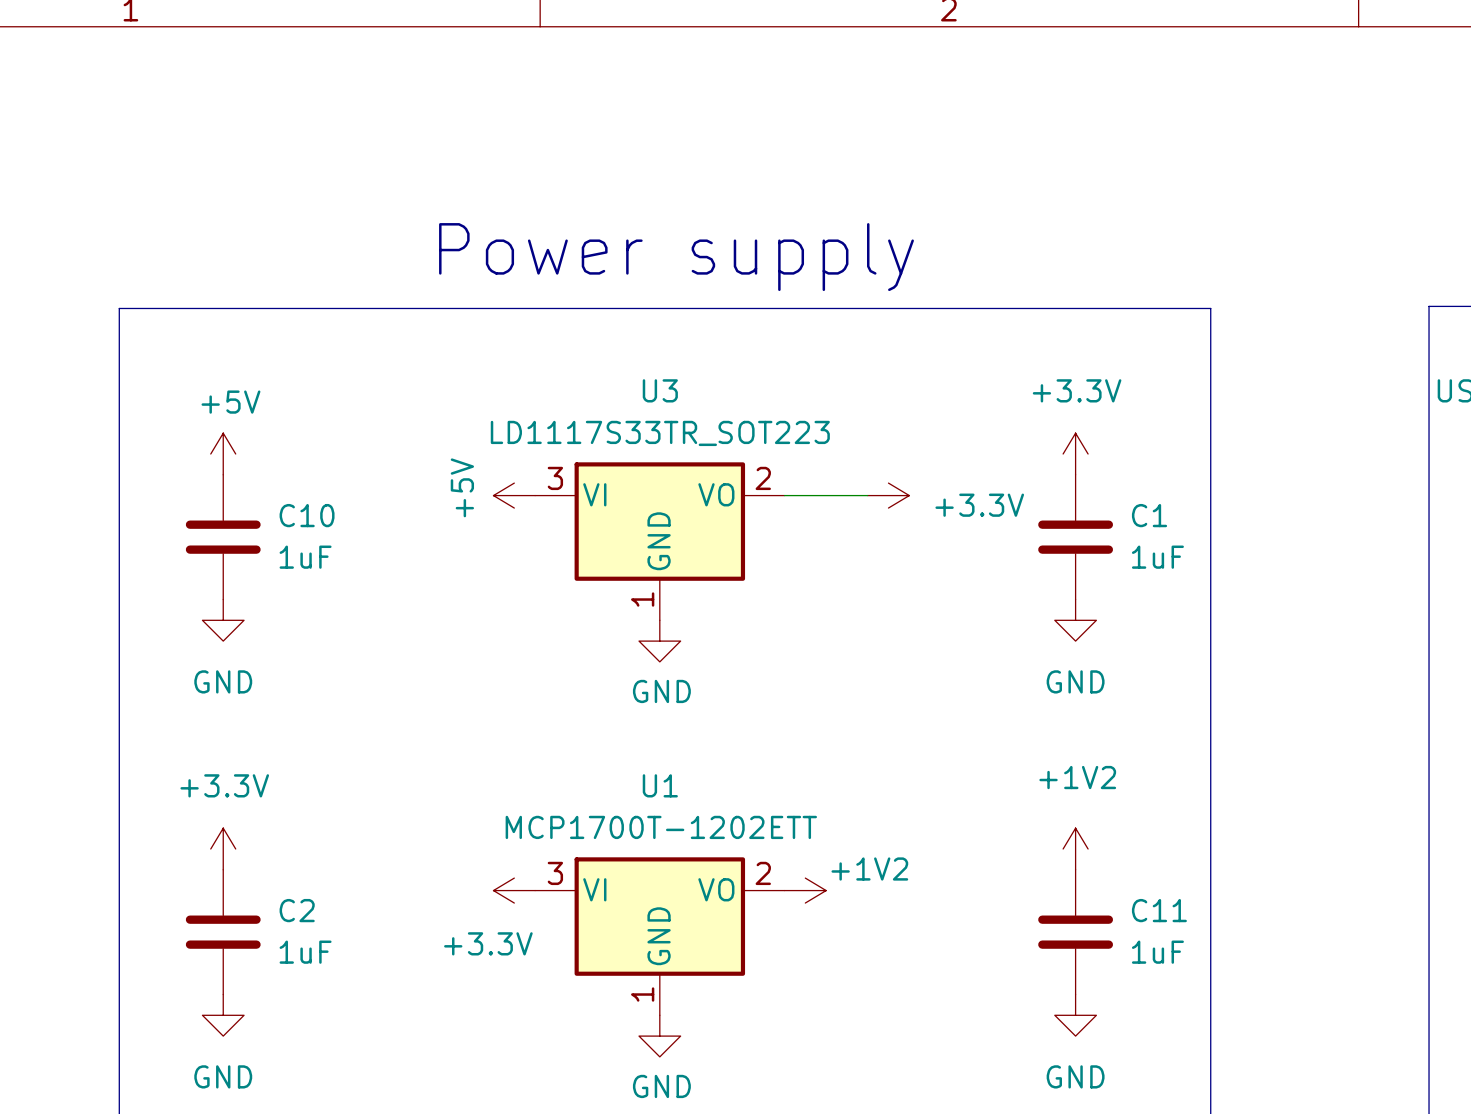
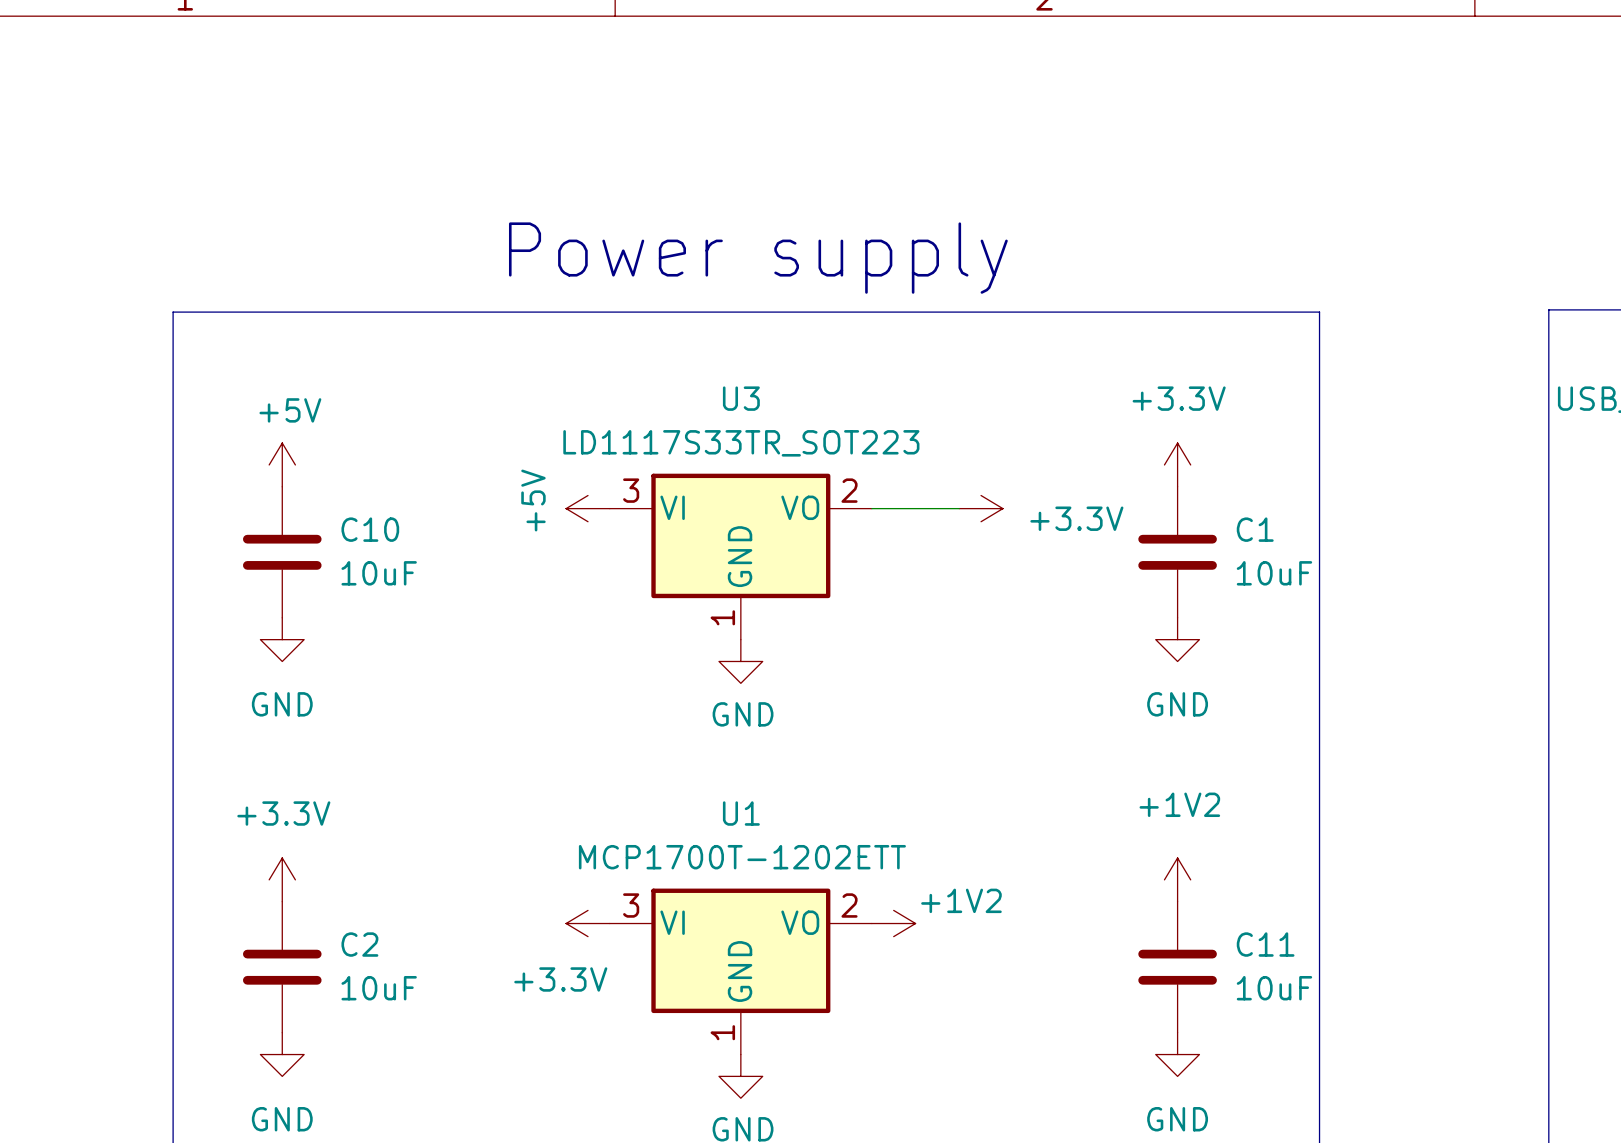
C10 value: 1uF (305, 557) -> 10uF (379, 573)
C1 value: 1uF (1157, 557) -> 10uF (1274, 573)
C2 value: 1uF (305, 952) -> 10uF (379, 988)
C11 value: 1uF (1157, 952) -> 10uF (1274, 988)

